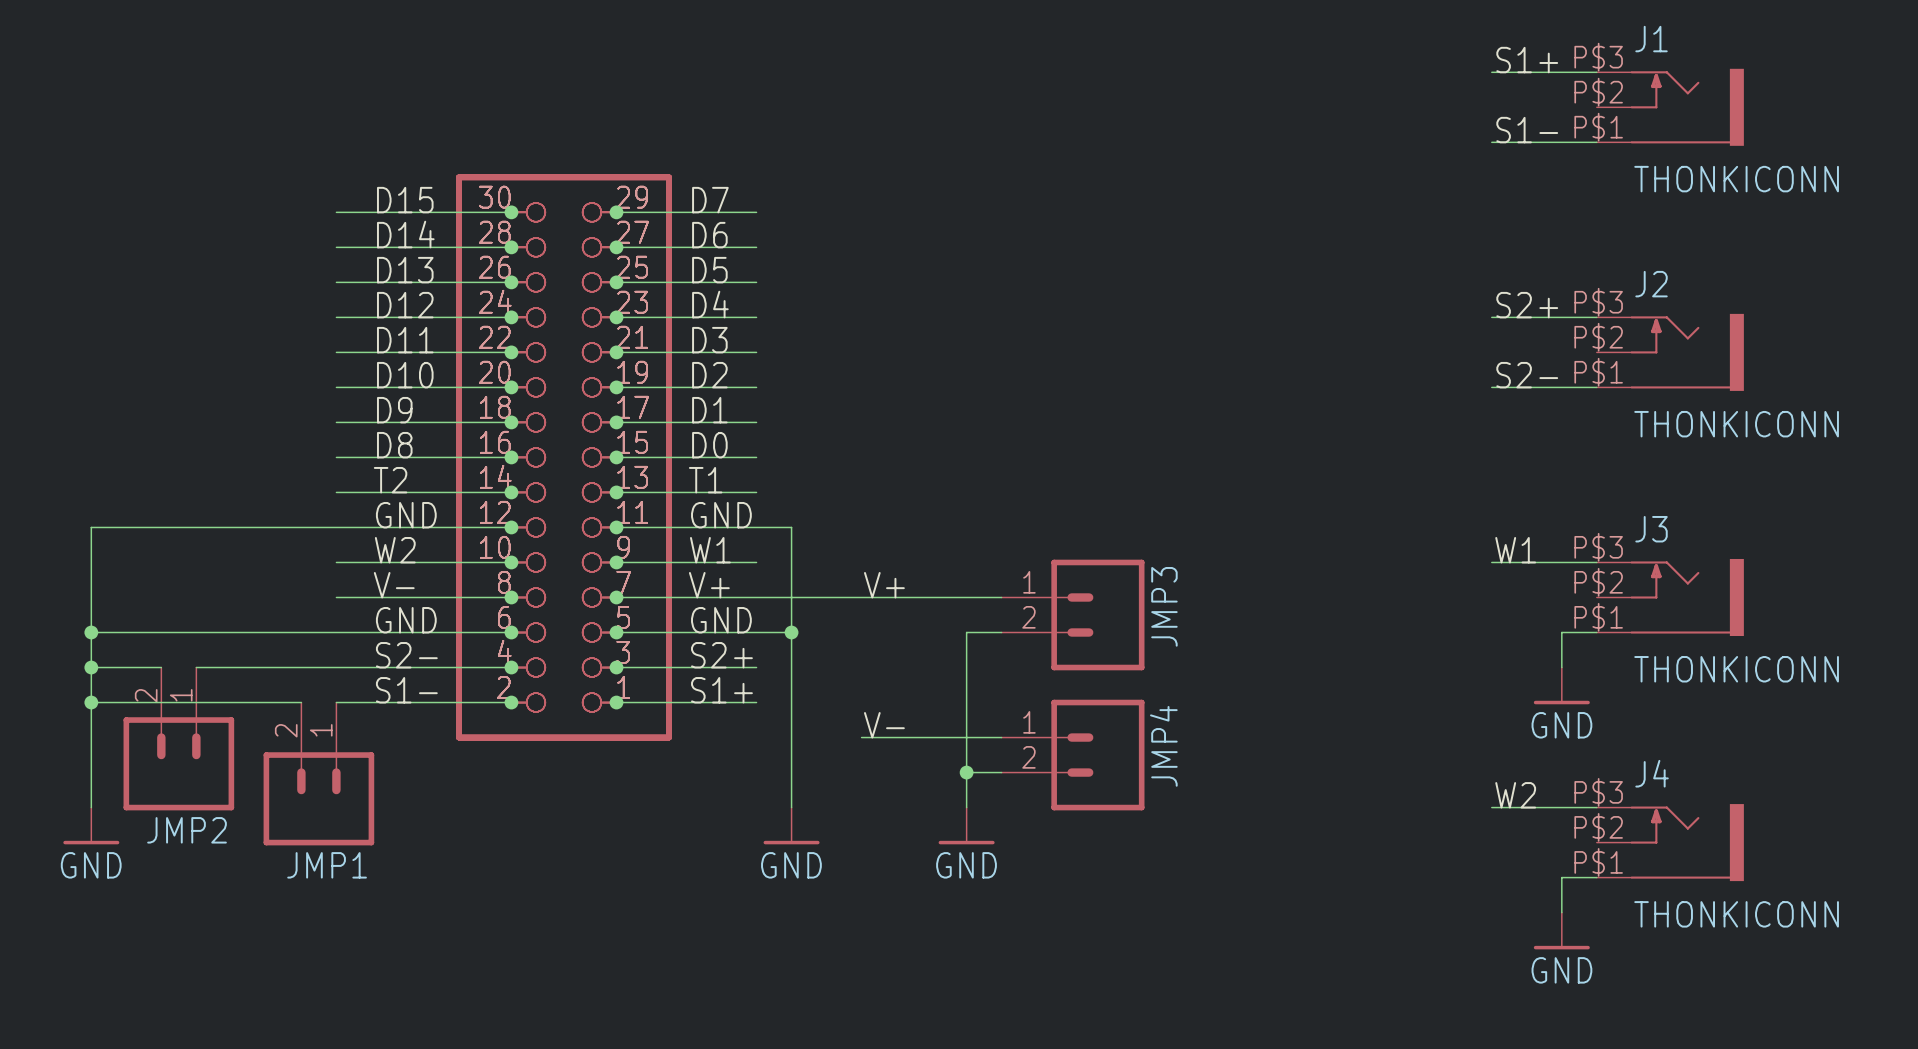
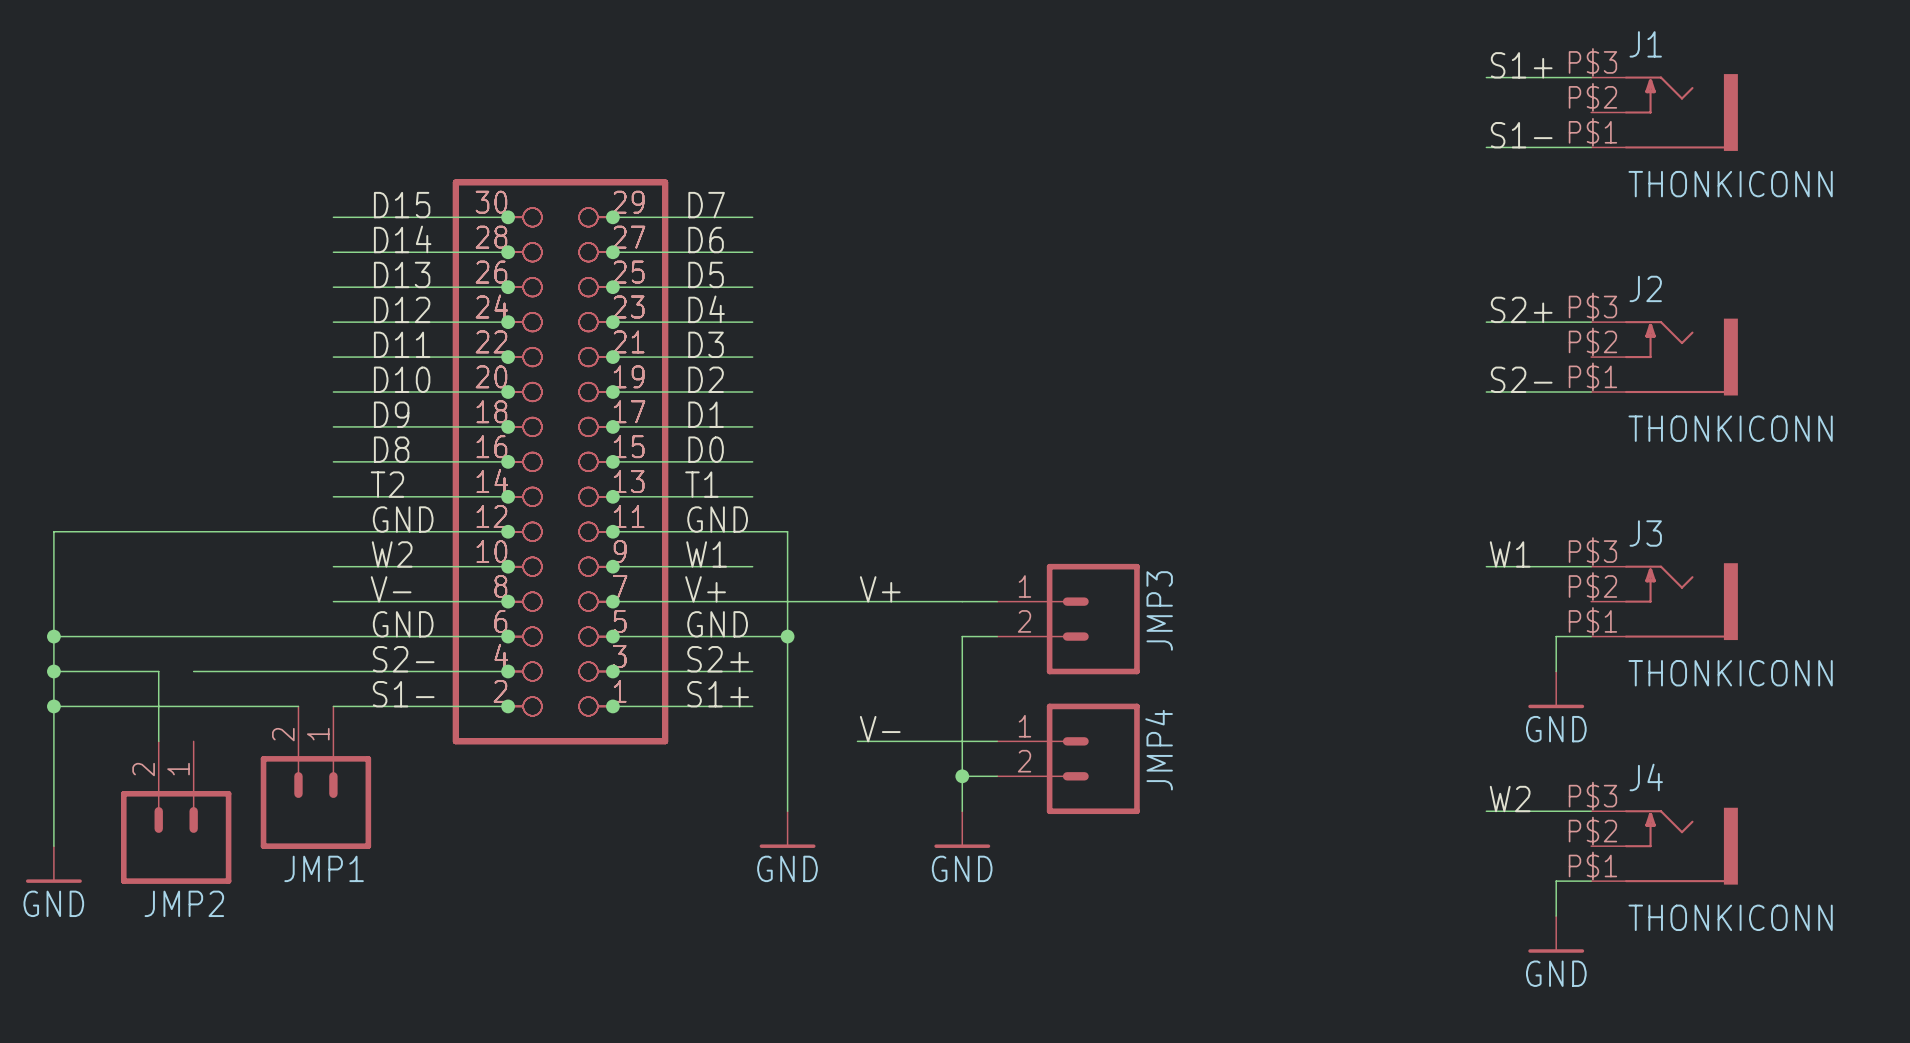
wire: (91, 527) (91, 807) -> (88, 531) (53, 531) (53, 846)
wire: none -> (53, 636) (88, 636)
junction: none -> (53, 636)
junction: (91, 632) -> none
wire: none -> (53, 671) (88, 671)
junction: none -> (53, 671)
junction: (91, 667) -> none
wire: none -> (53, 706) (88, 706)
junction: none -> (53, 706)
junction: (91, 702) -> none
JMP2 position: (178, 738) -> (176, 812)
power symbol position: GND (91, 825) -> GND (53, 864)

